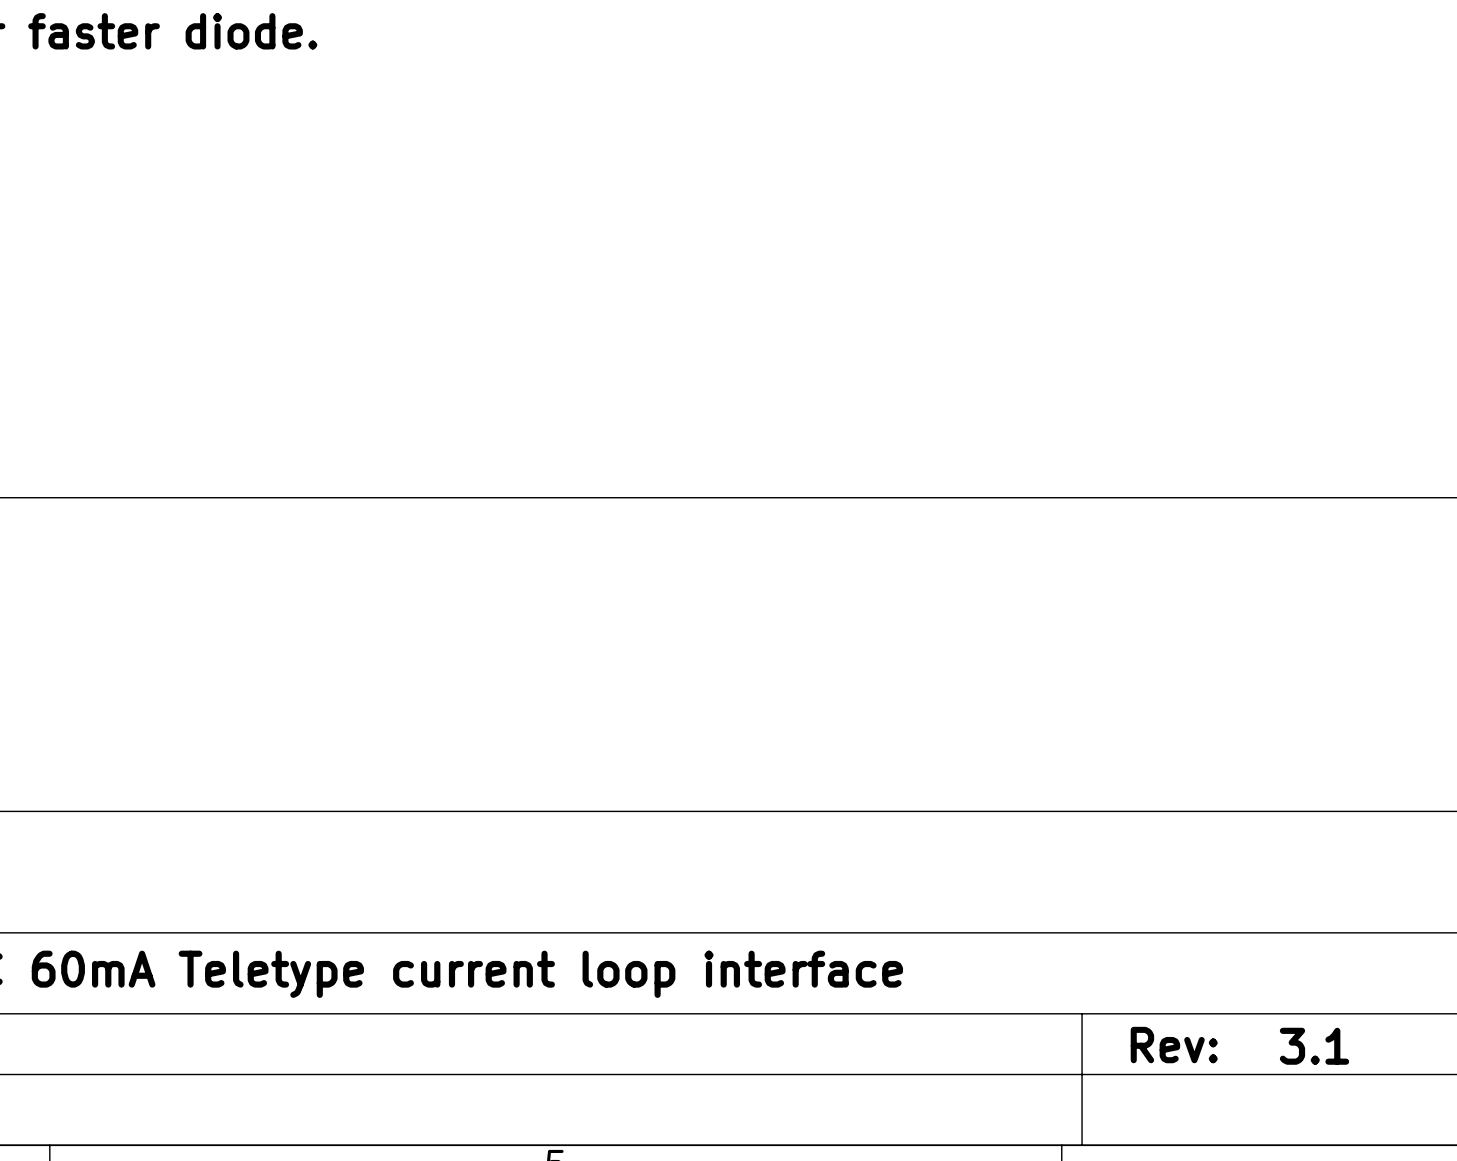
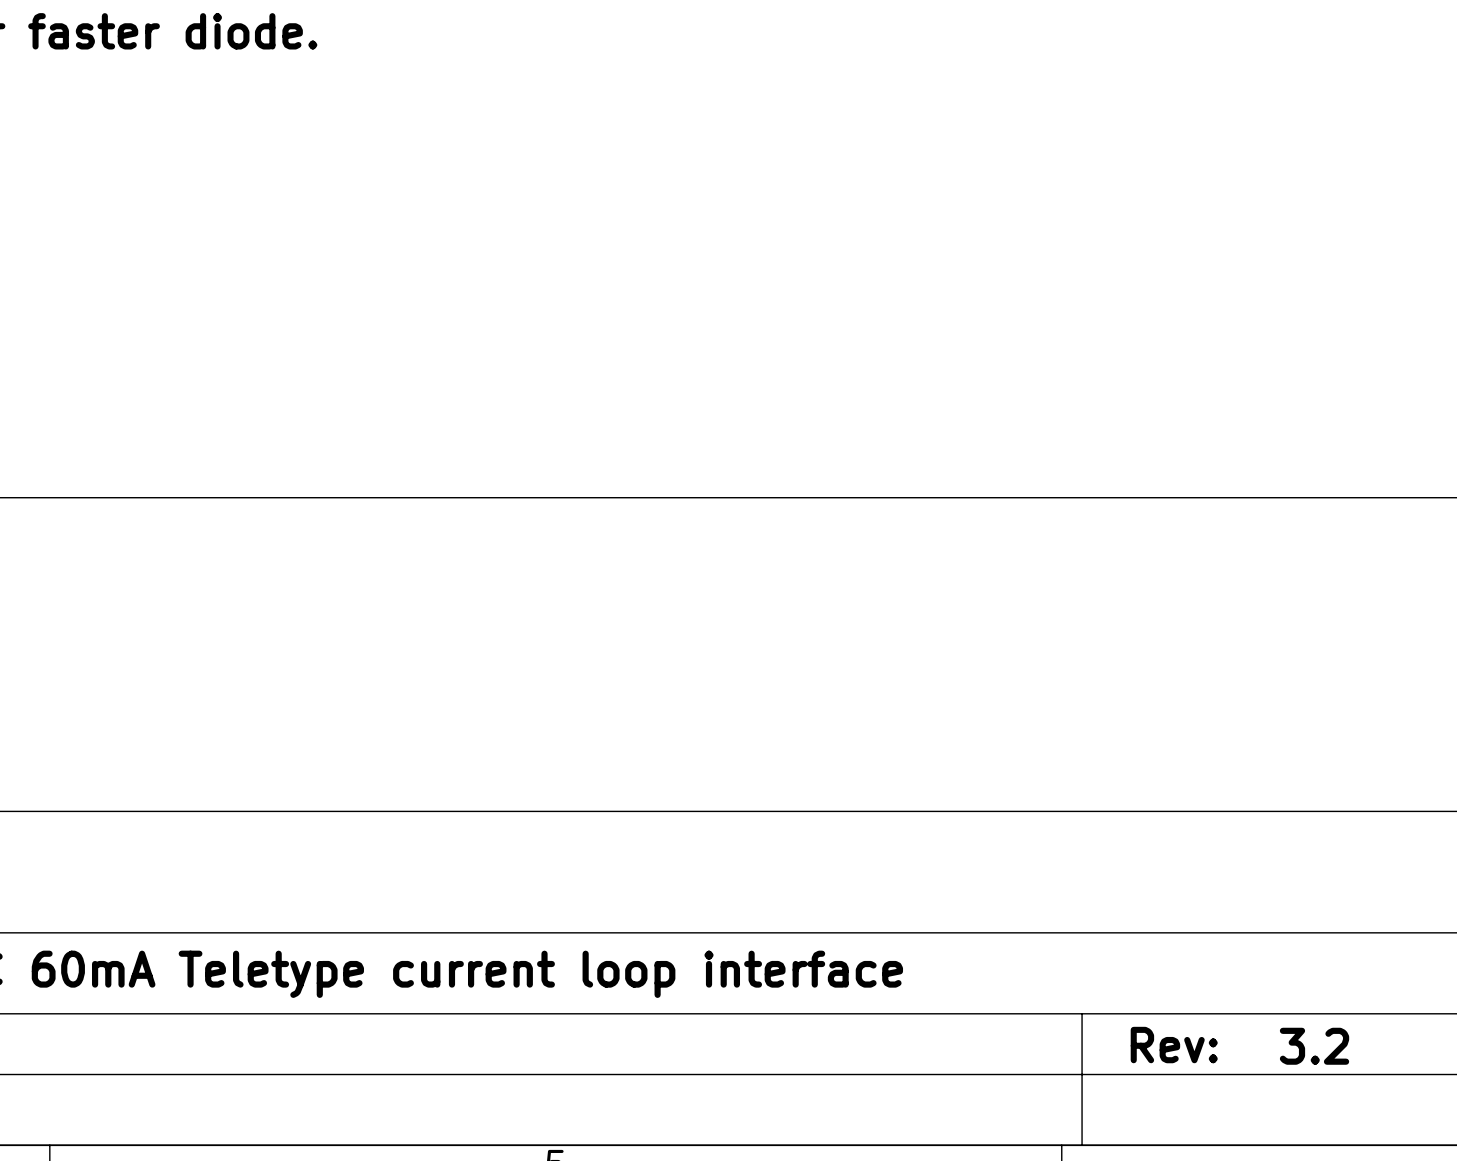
text: 3.1 (1314, 1046) -> 3.2 (1314, 1046)

